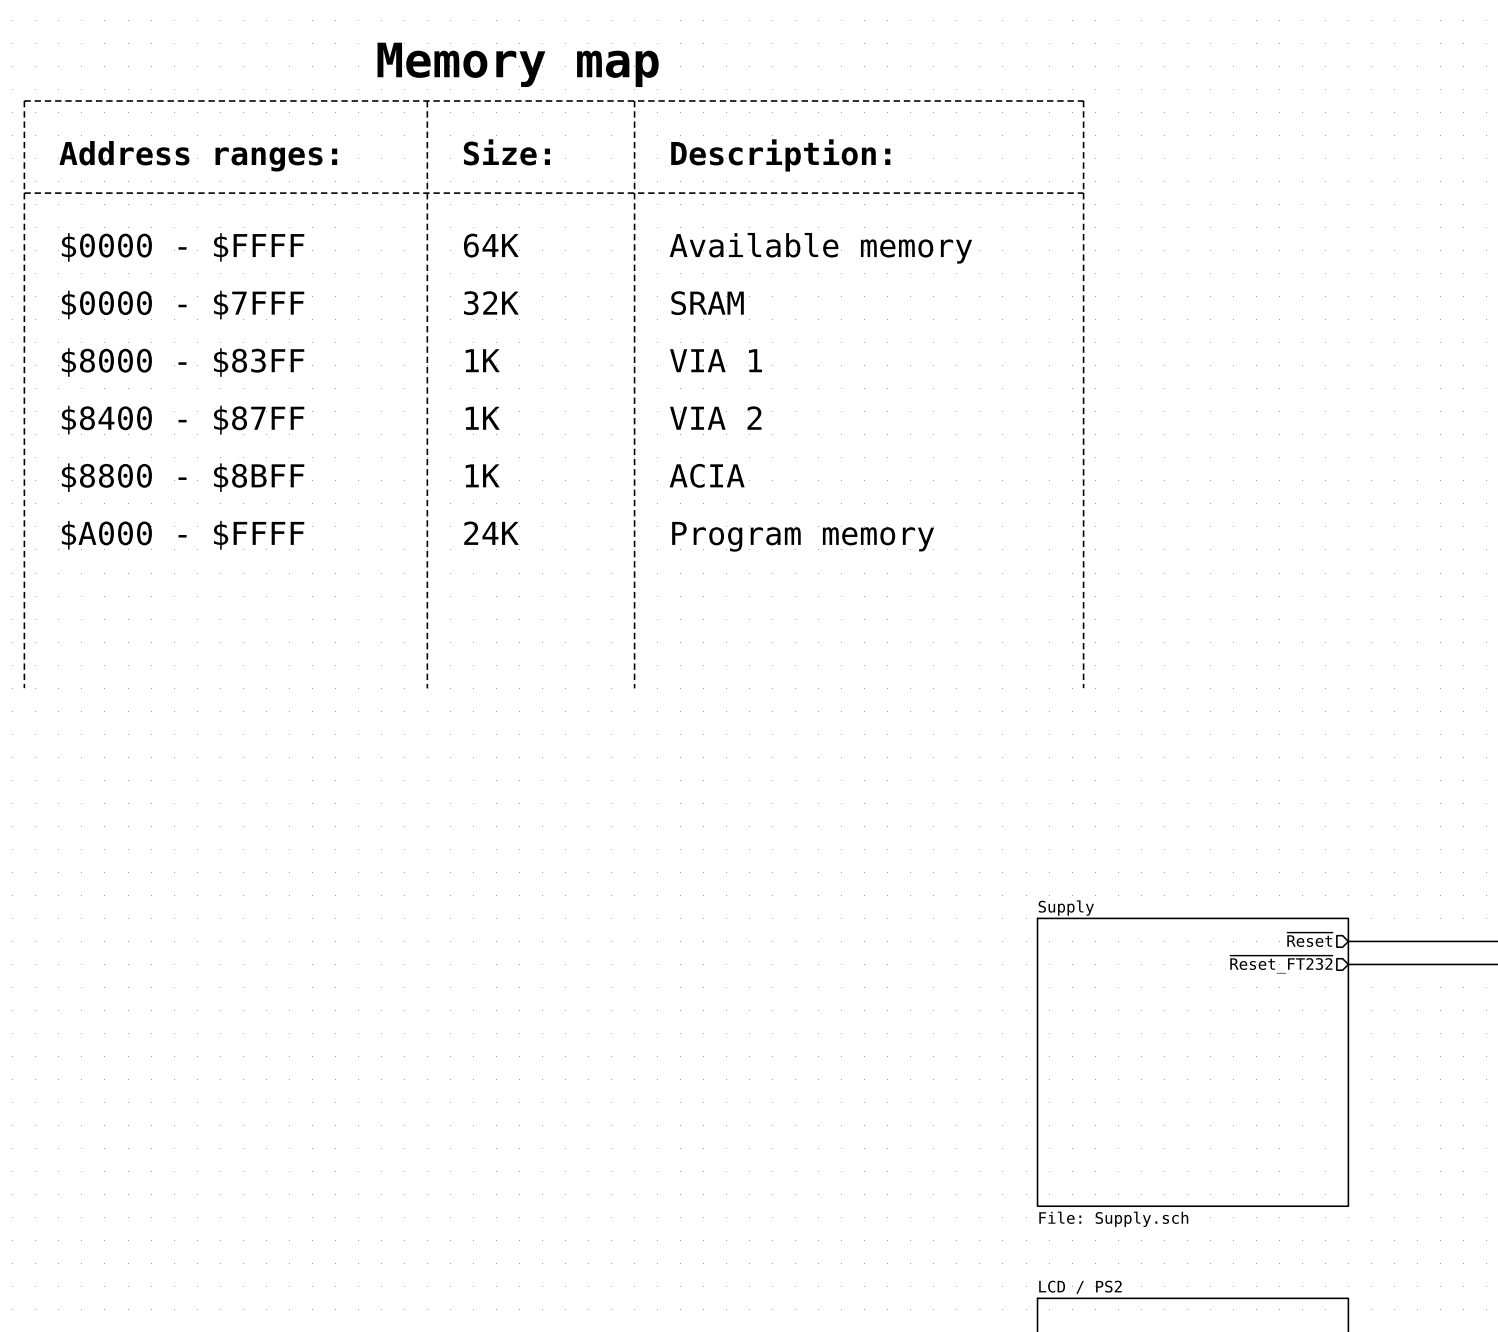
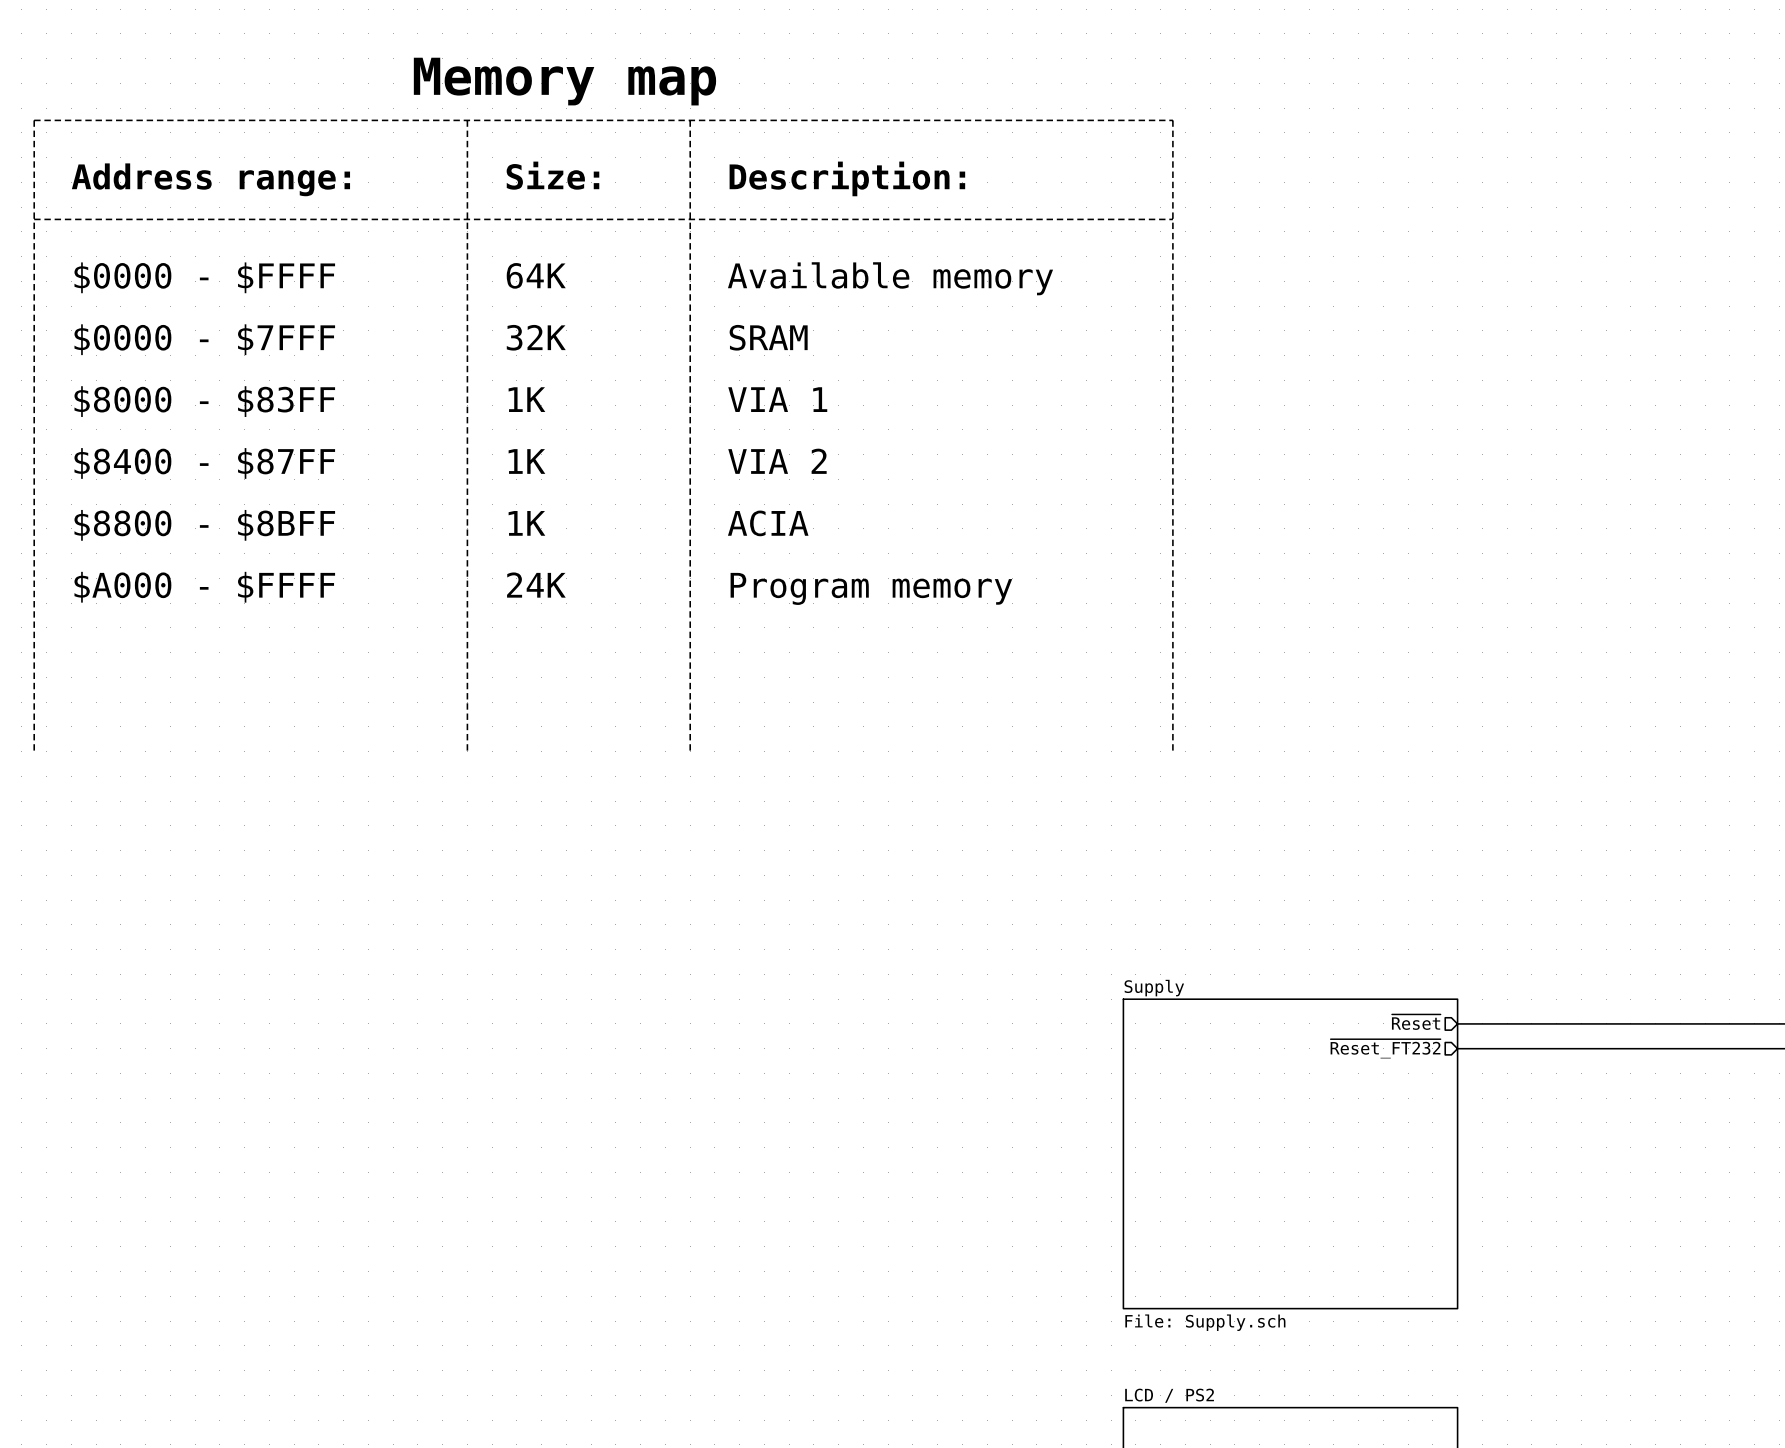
text: Address ranges: (198, 156) -> Address range: (210, 179)

